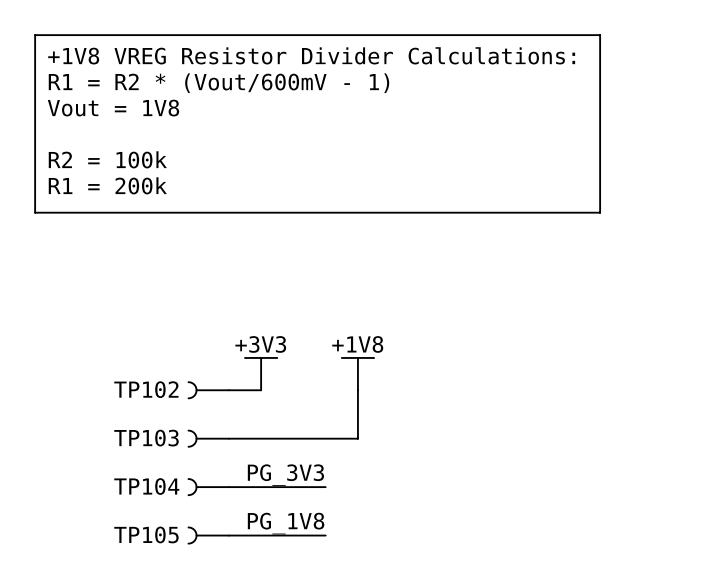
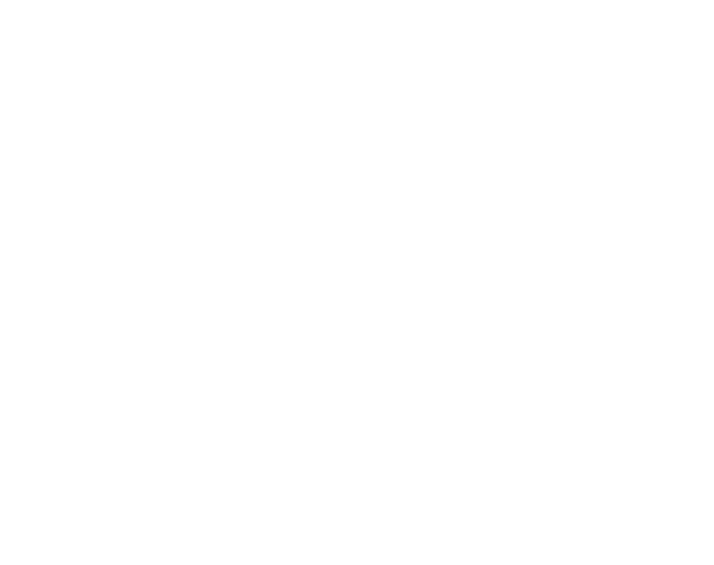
line: (35, 35) (600, 35) (600, 212) (35, 212) (35, 35) -> none
text: +1V8 VREG Resistor Divider Calculations: (311, 55) -> none
text: R1 = R2 * (Vout/600mV - 1) (218, 83) -> none
text: Vout = 1V8 (113, 108) -> none
text: R2 = 100k (107, 159) -> none
text: R1 = 200k (107, 185) -> none
power symbol: +3V3 (261, 374) -> none
power symbol: +1V8 (357, 374) -> none
TP102: (208, 390) -> none
wire: (228, 390) (261, 390) -> none
wire: (357, 390) (357, 438) (228, 438) -> none
TP103: (208, 438) -> none
label: PG_3V3 (285, 475) -> none
TP104: (208, 487) -> none
wire: (228, 487) (325, 487) -> none
label: PG_1V8 (286, 523) -> none
TP105: (208, 535) -> none
wire: (228, 535) (325, 535) -> none

